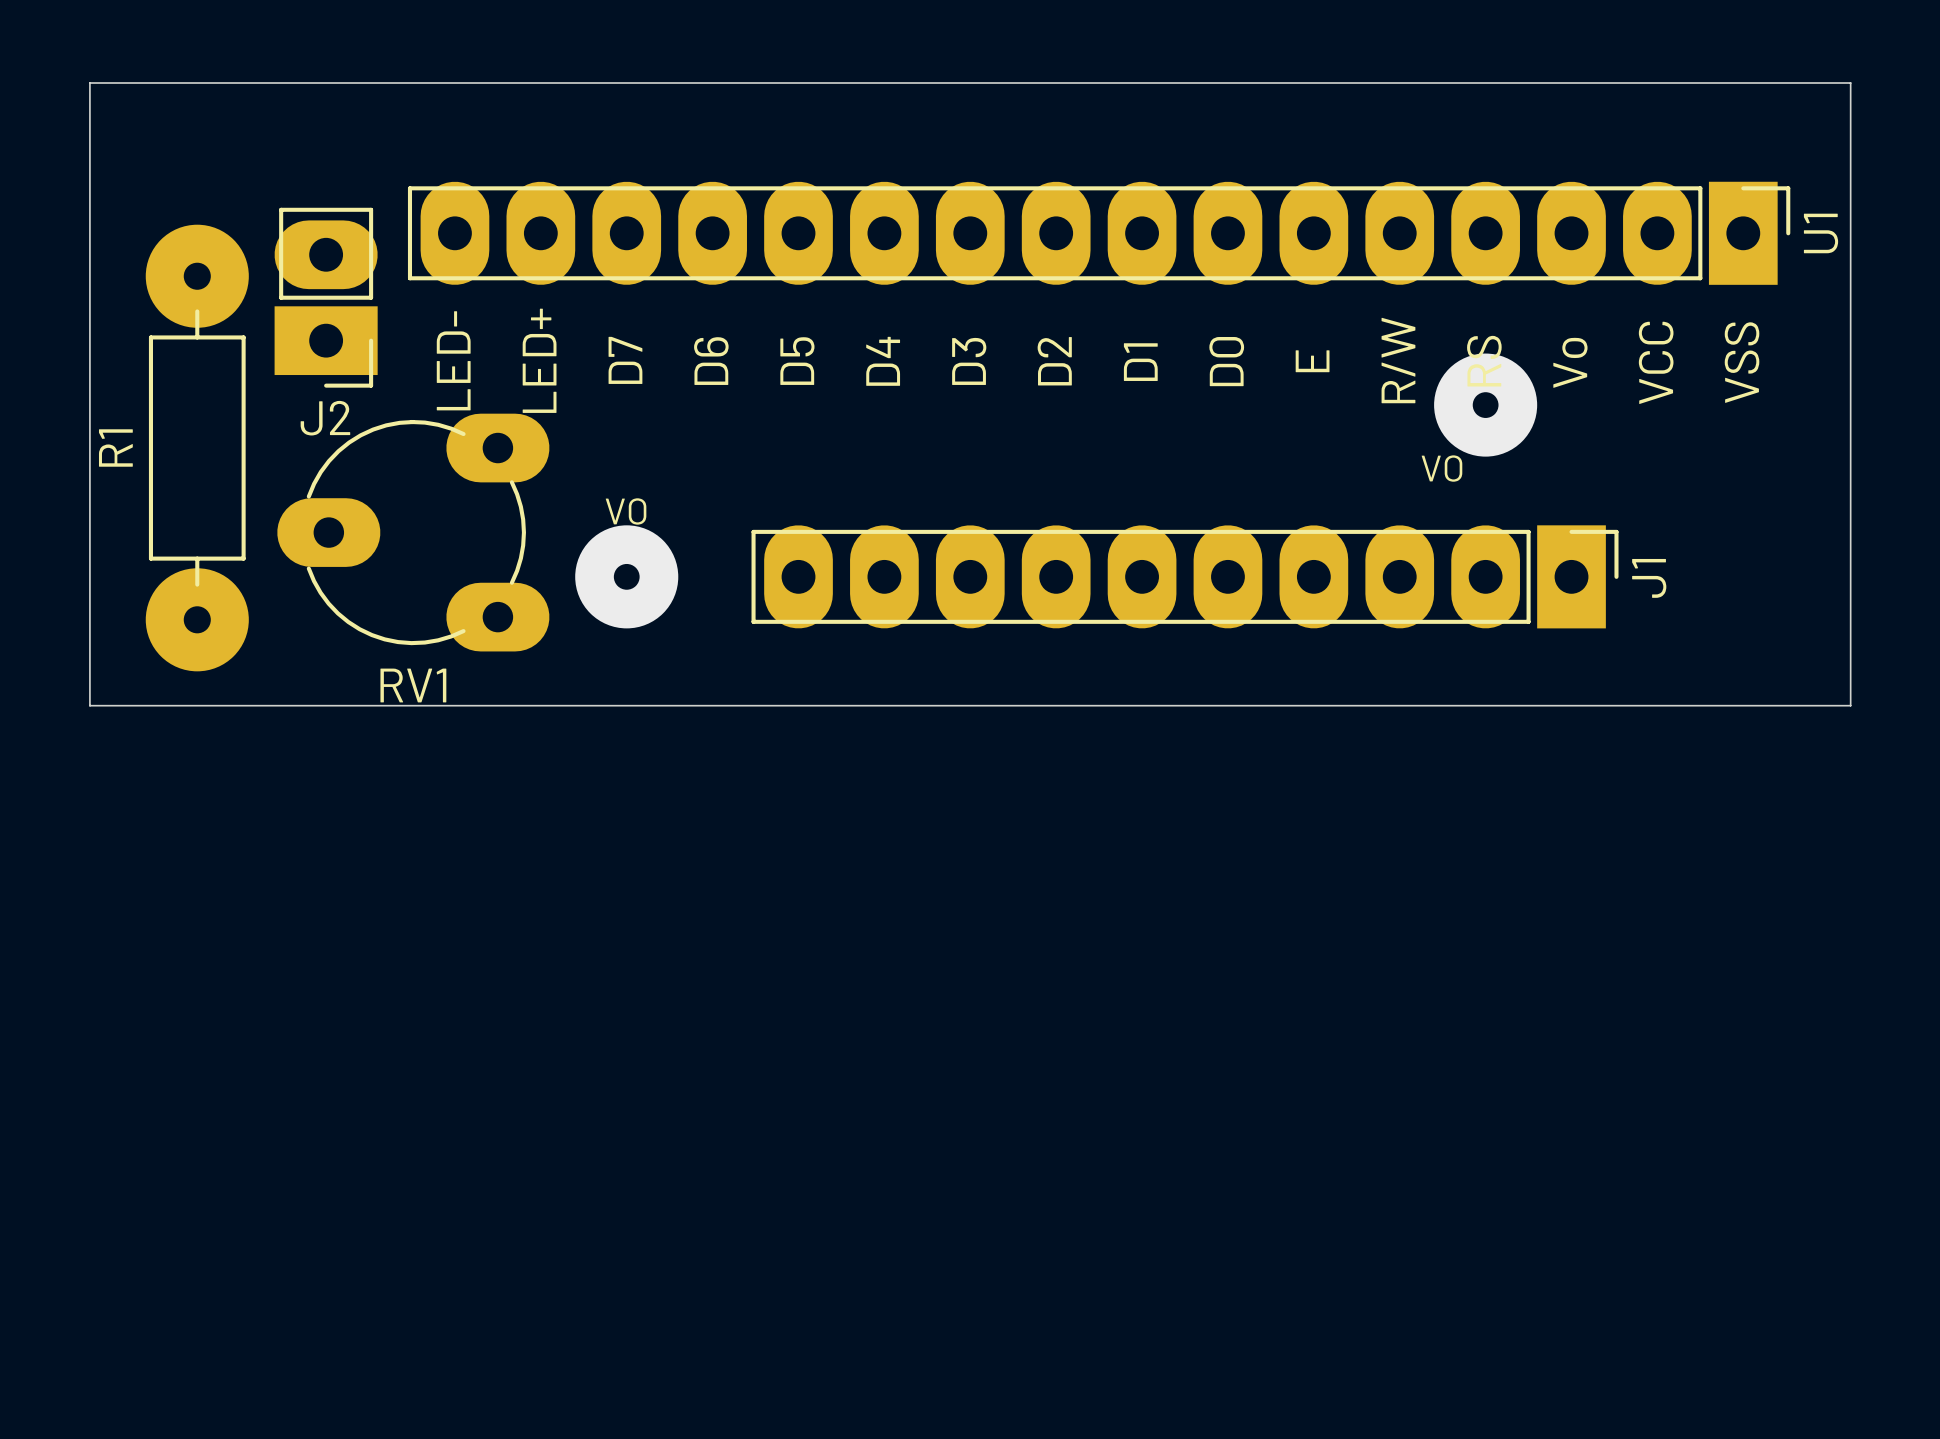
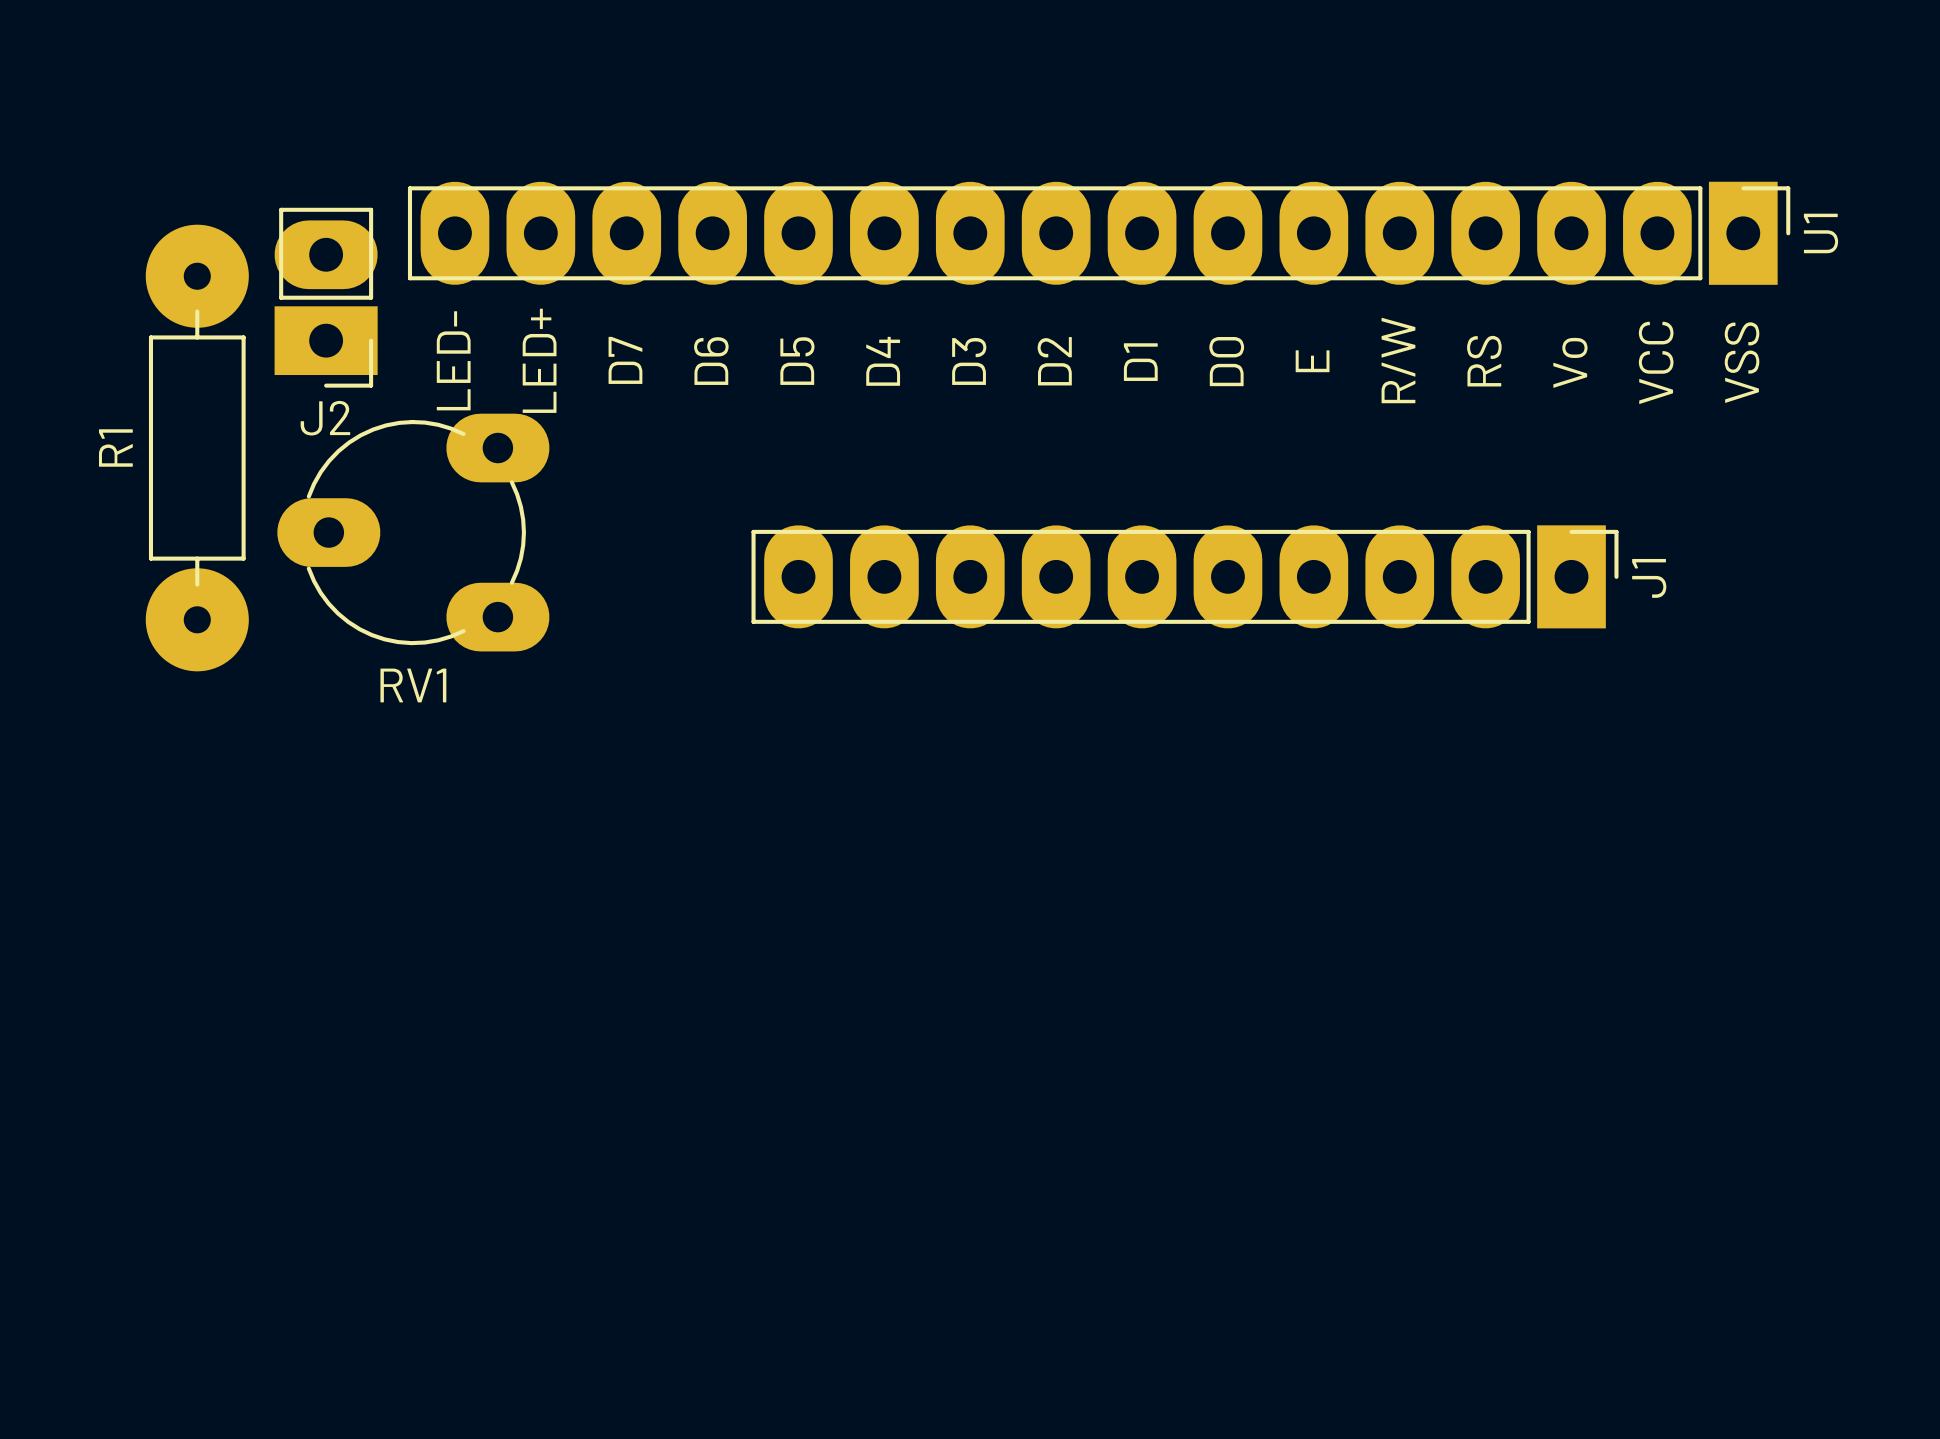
board edge: (89, 83) (1850, 83) (1850, 705) (89, 705) (89, 83) -> none
via: (1485, 405) -> none
text: VO (1441, 468) -> none
text: VO (626, 511) -> none
via: (626, 576) -> none

